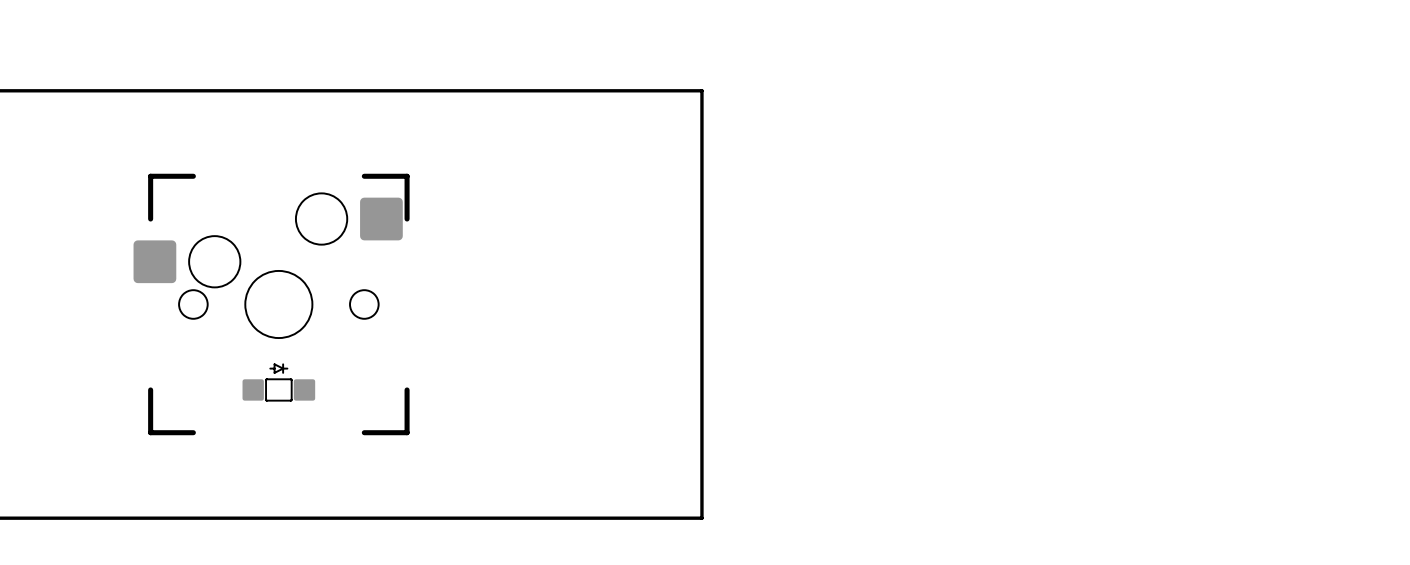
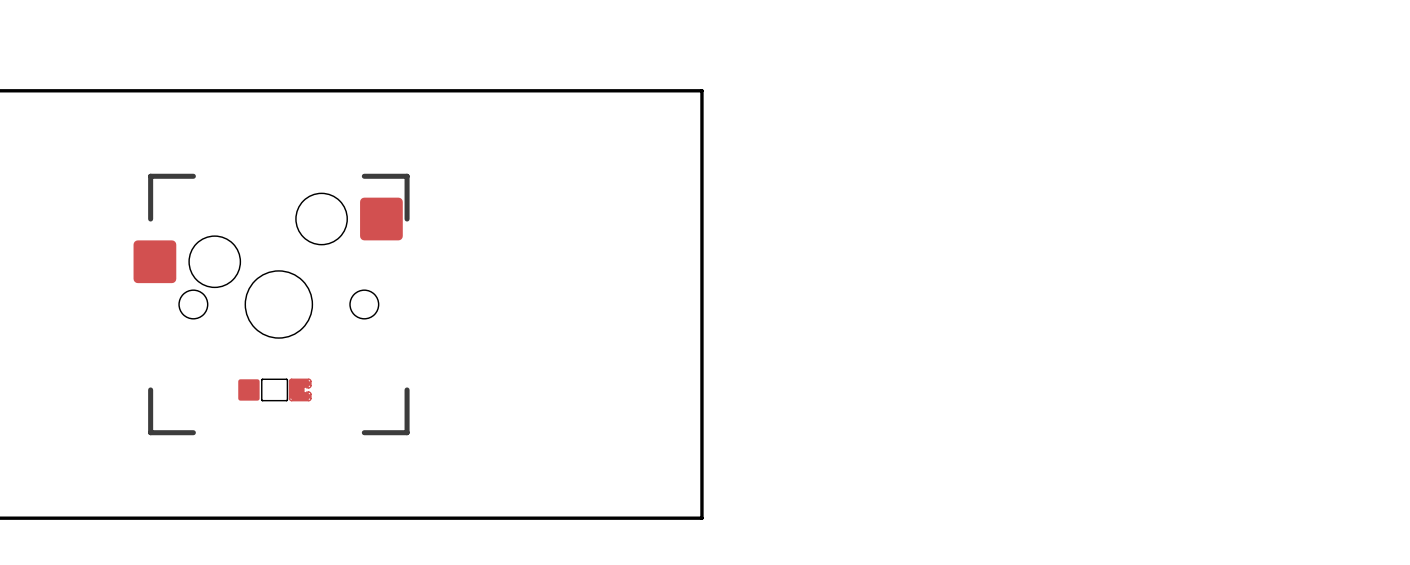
part footprint: [242, 363, 316, 401] -> [238, 379, 312, 401]

